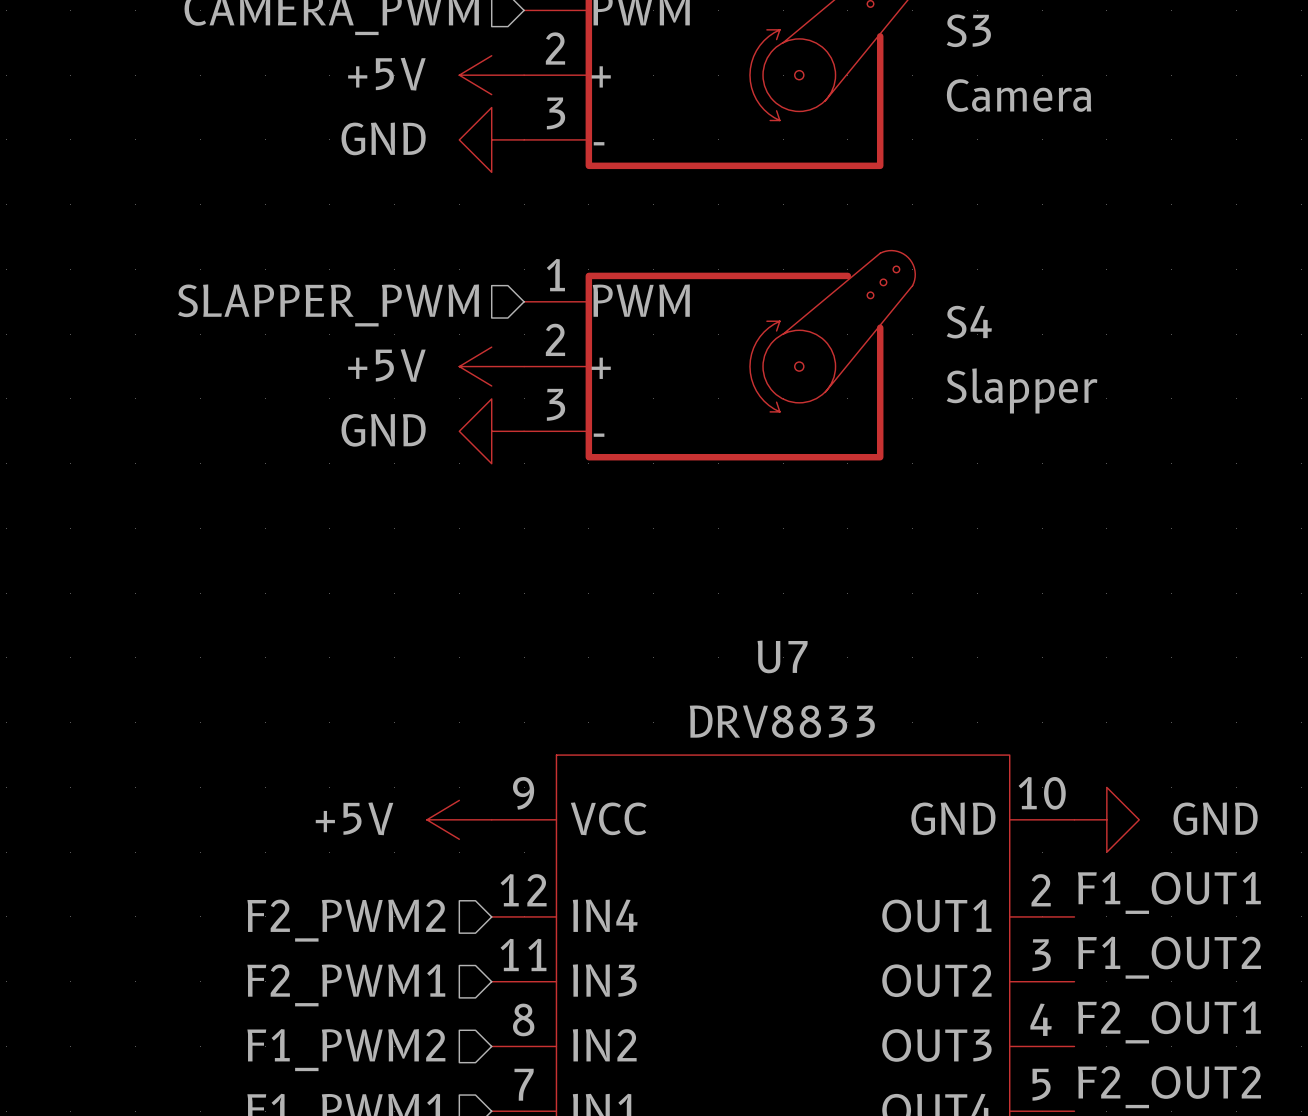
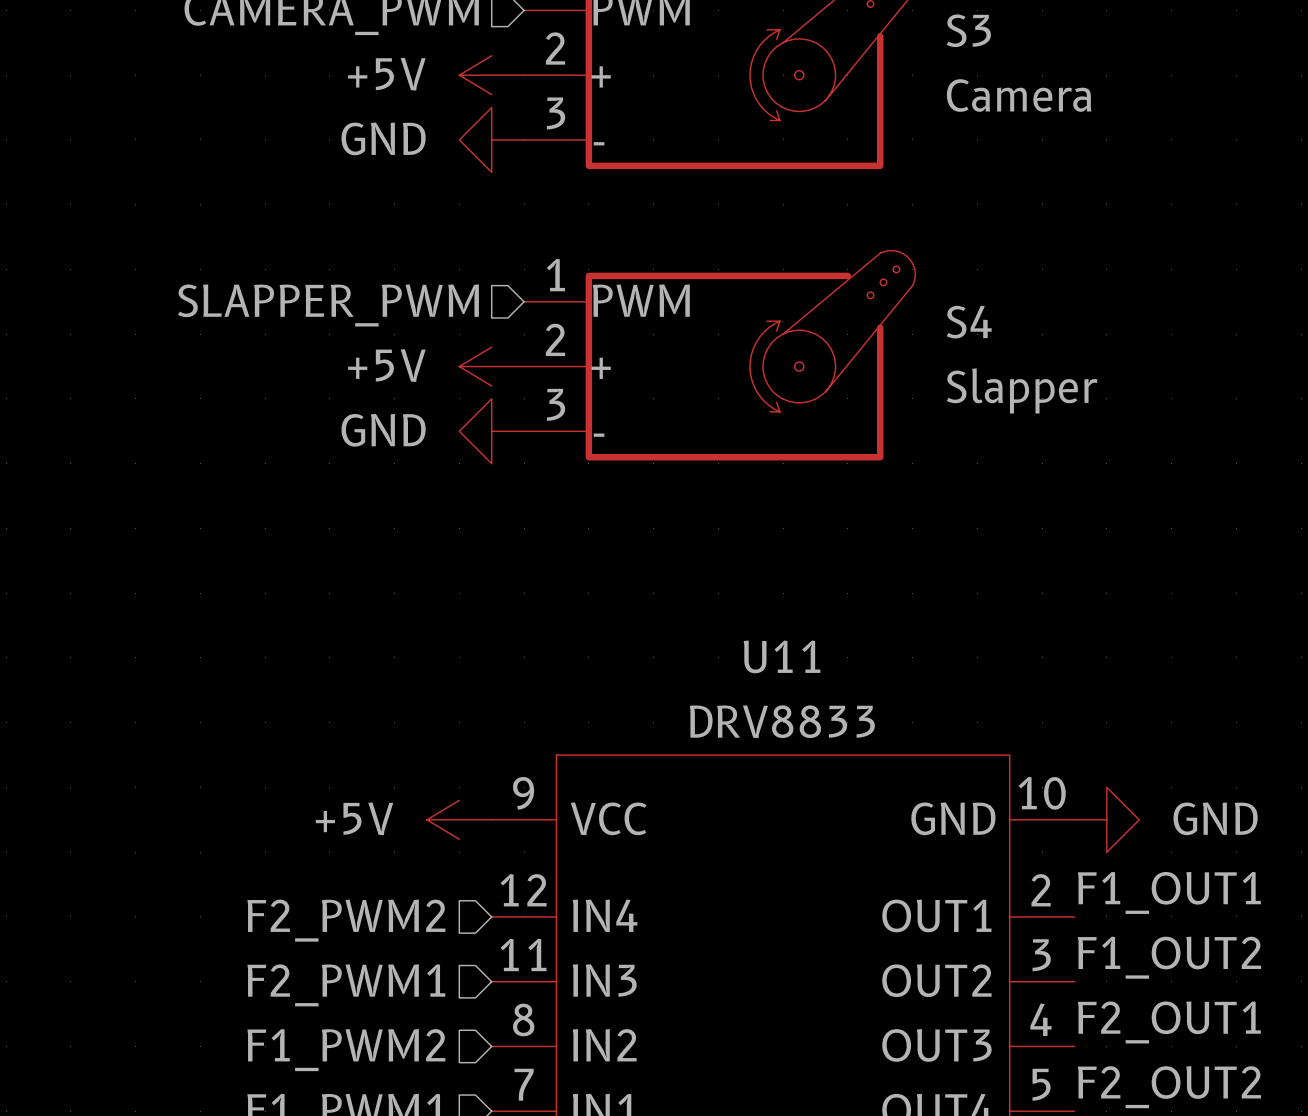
U7 name: U7 (782, 656) -> U11 (782, 656)

